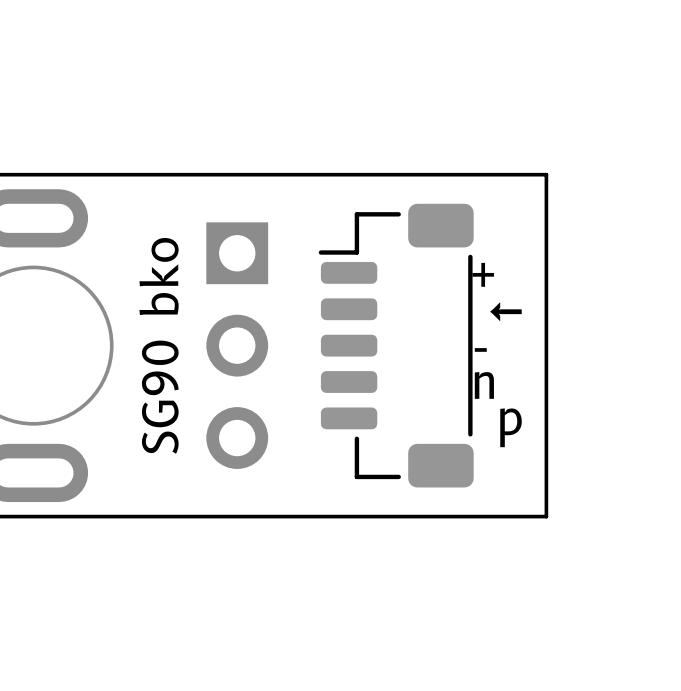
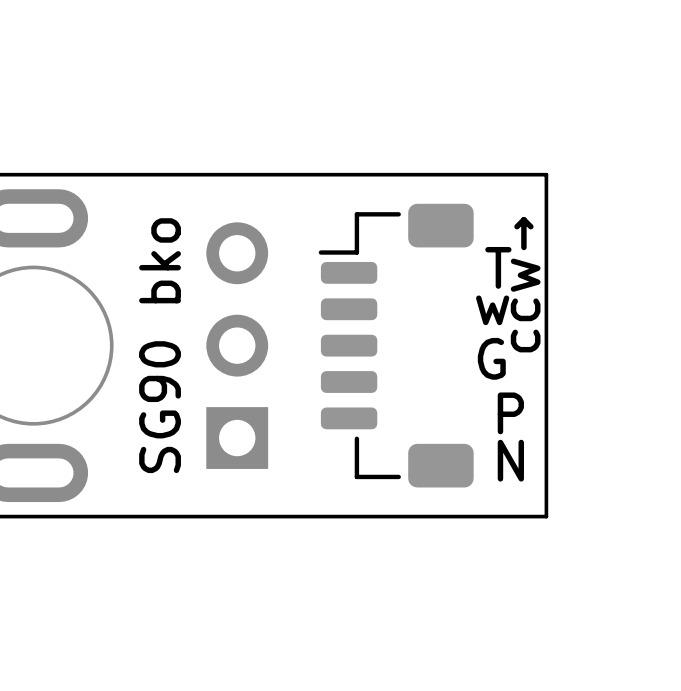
part footprint: [318, 203, 474, 488] -> [318, 203, 474, 488]
text: + (483, 274) -> T (498, 267)
text: none -> ccw→ (525, 284)
text: none -> w (492, 310)
text: ← (505, 311) -> none
part rotation: 0° (237, 345) -> 180° (237, 345)
text: - (480, 349) -> none
text: none -> G (491, 358)
text: n (484, 385) -> none
text: p (511, 427) -> P (510, 413)
text: none -> N (510, 460)

